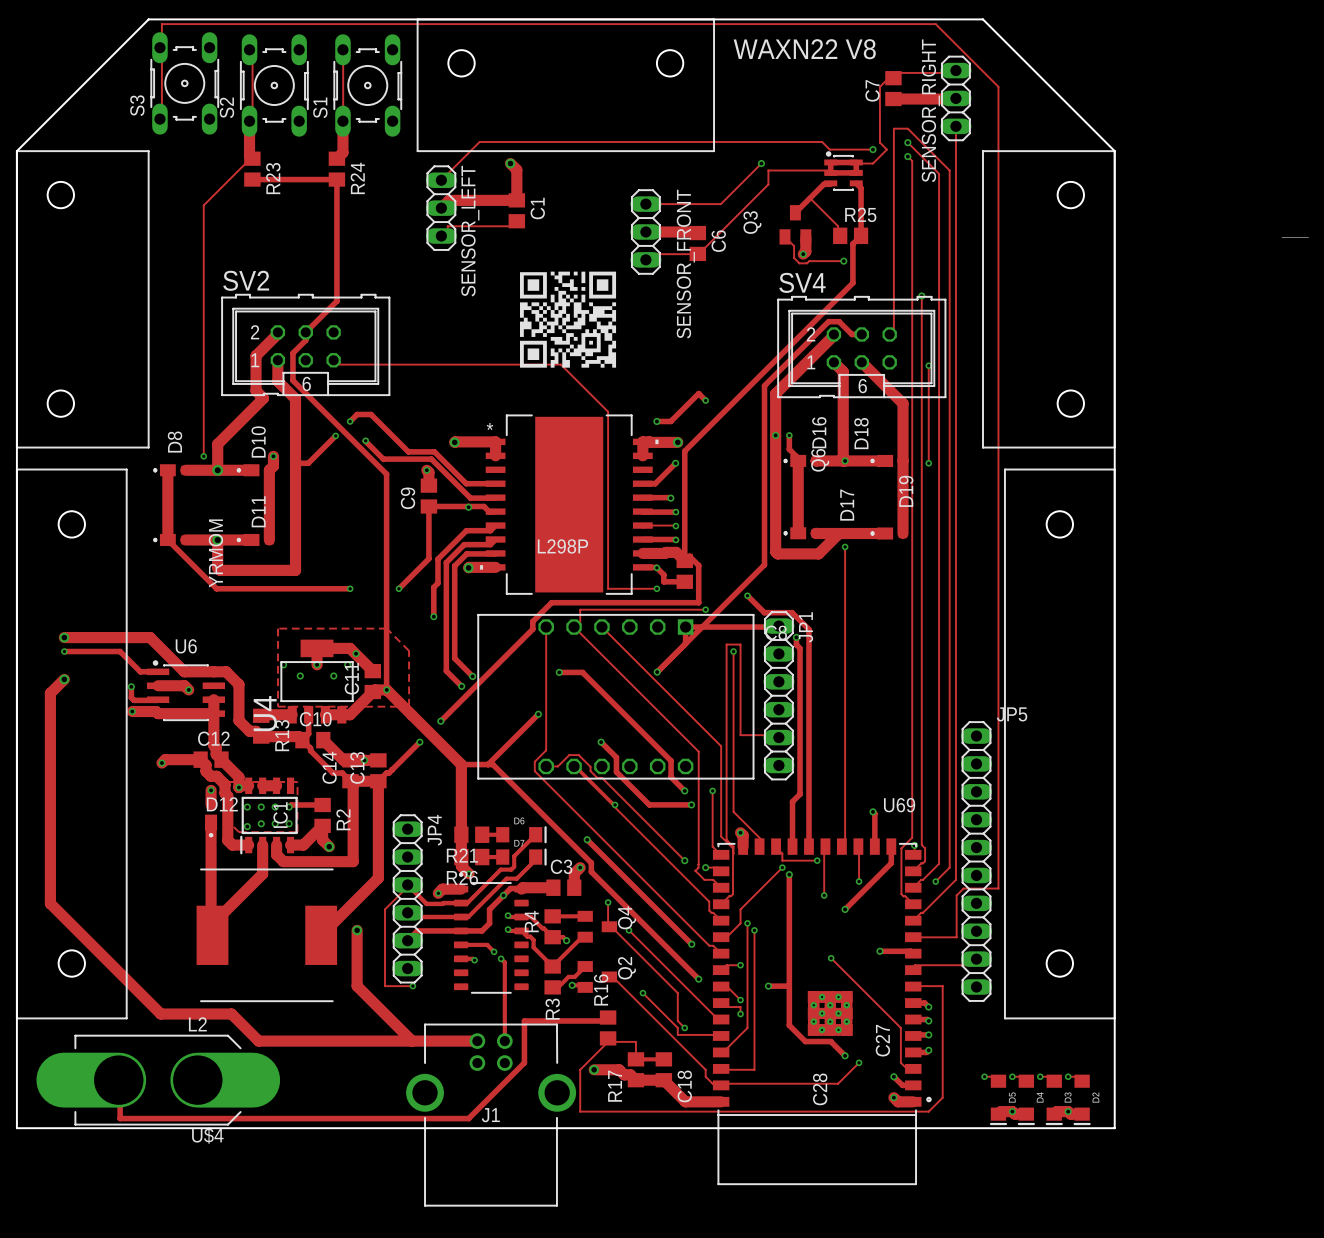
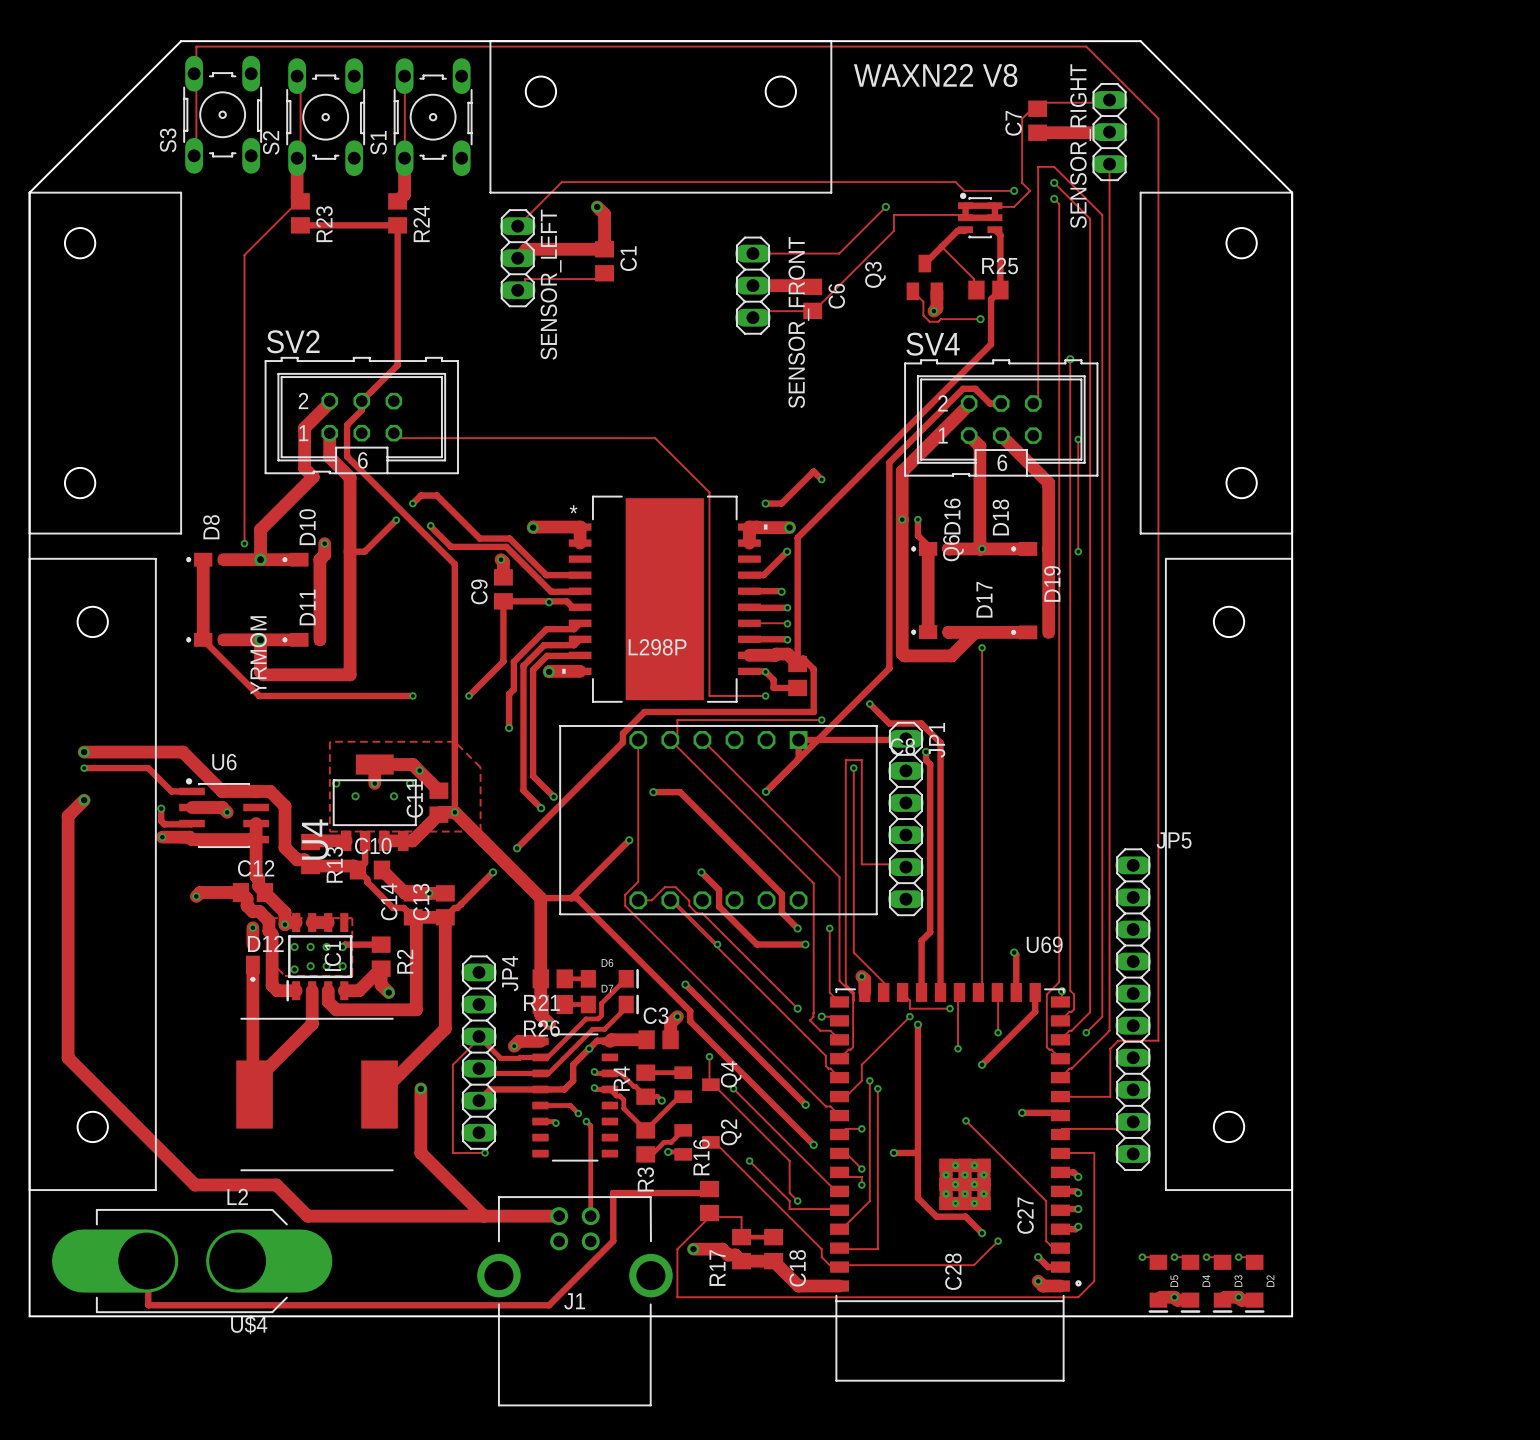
drawing: [1281, 237, 1309, 238] -> none
drawing: [519, 271, 617, 368] -> none

